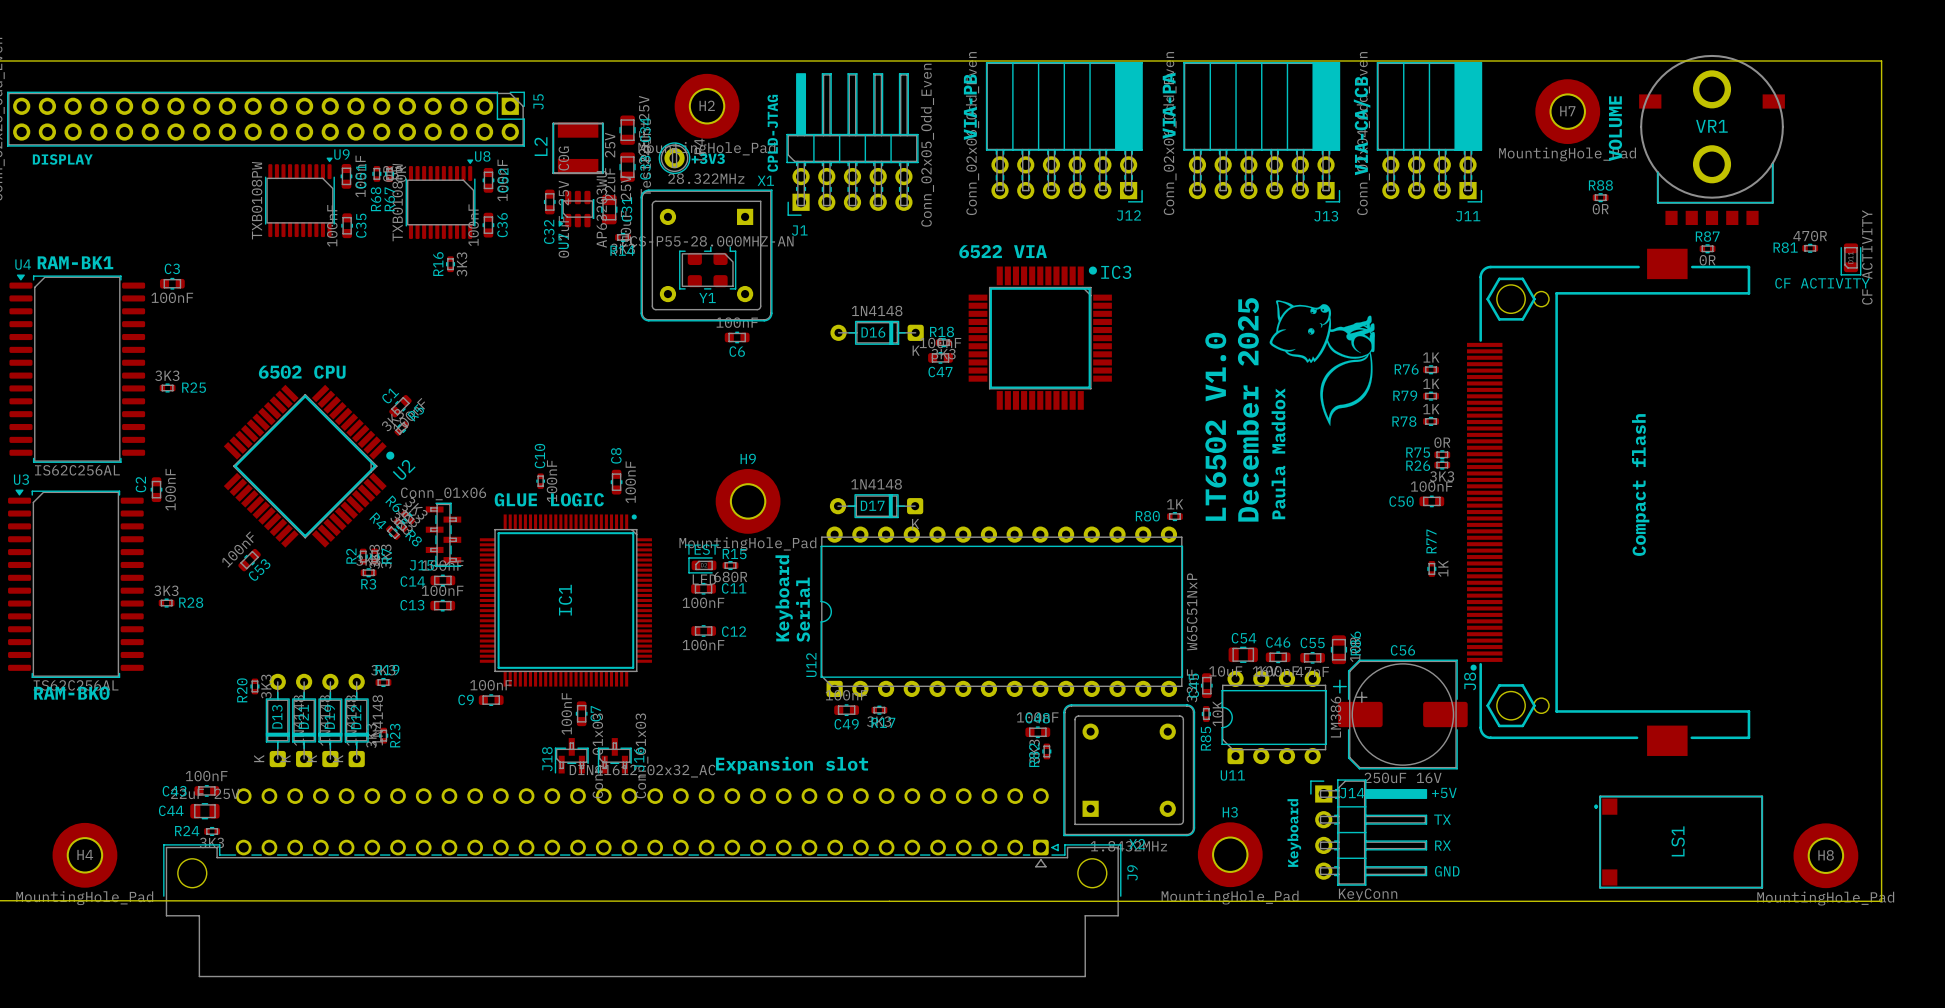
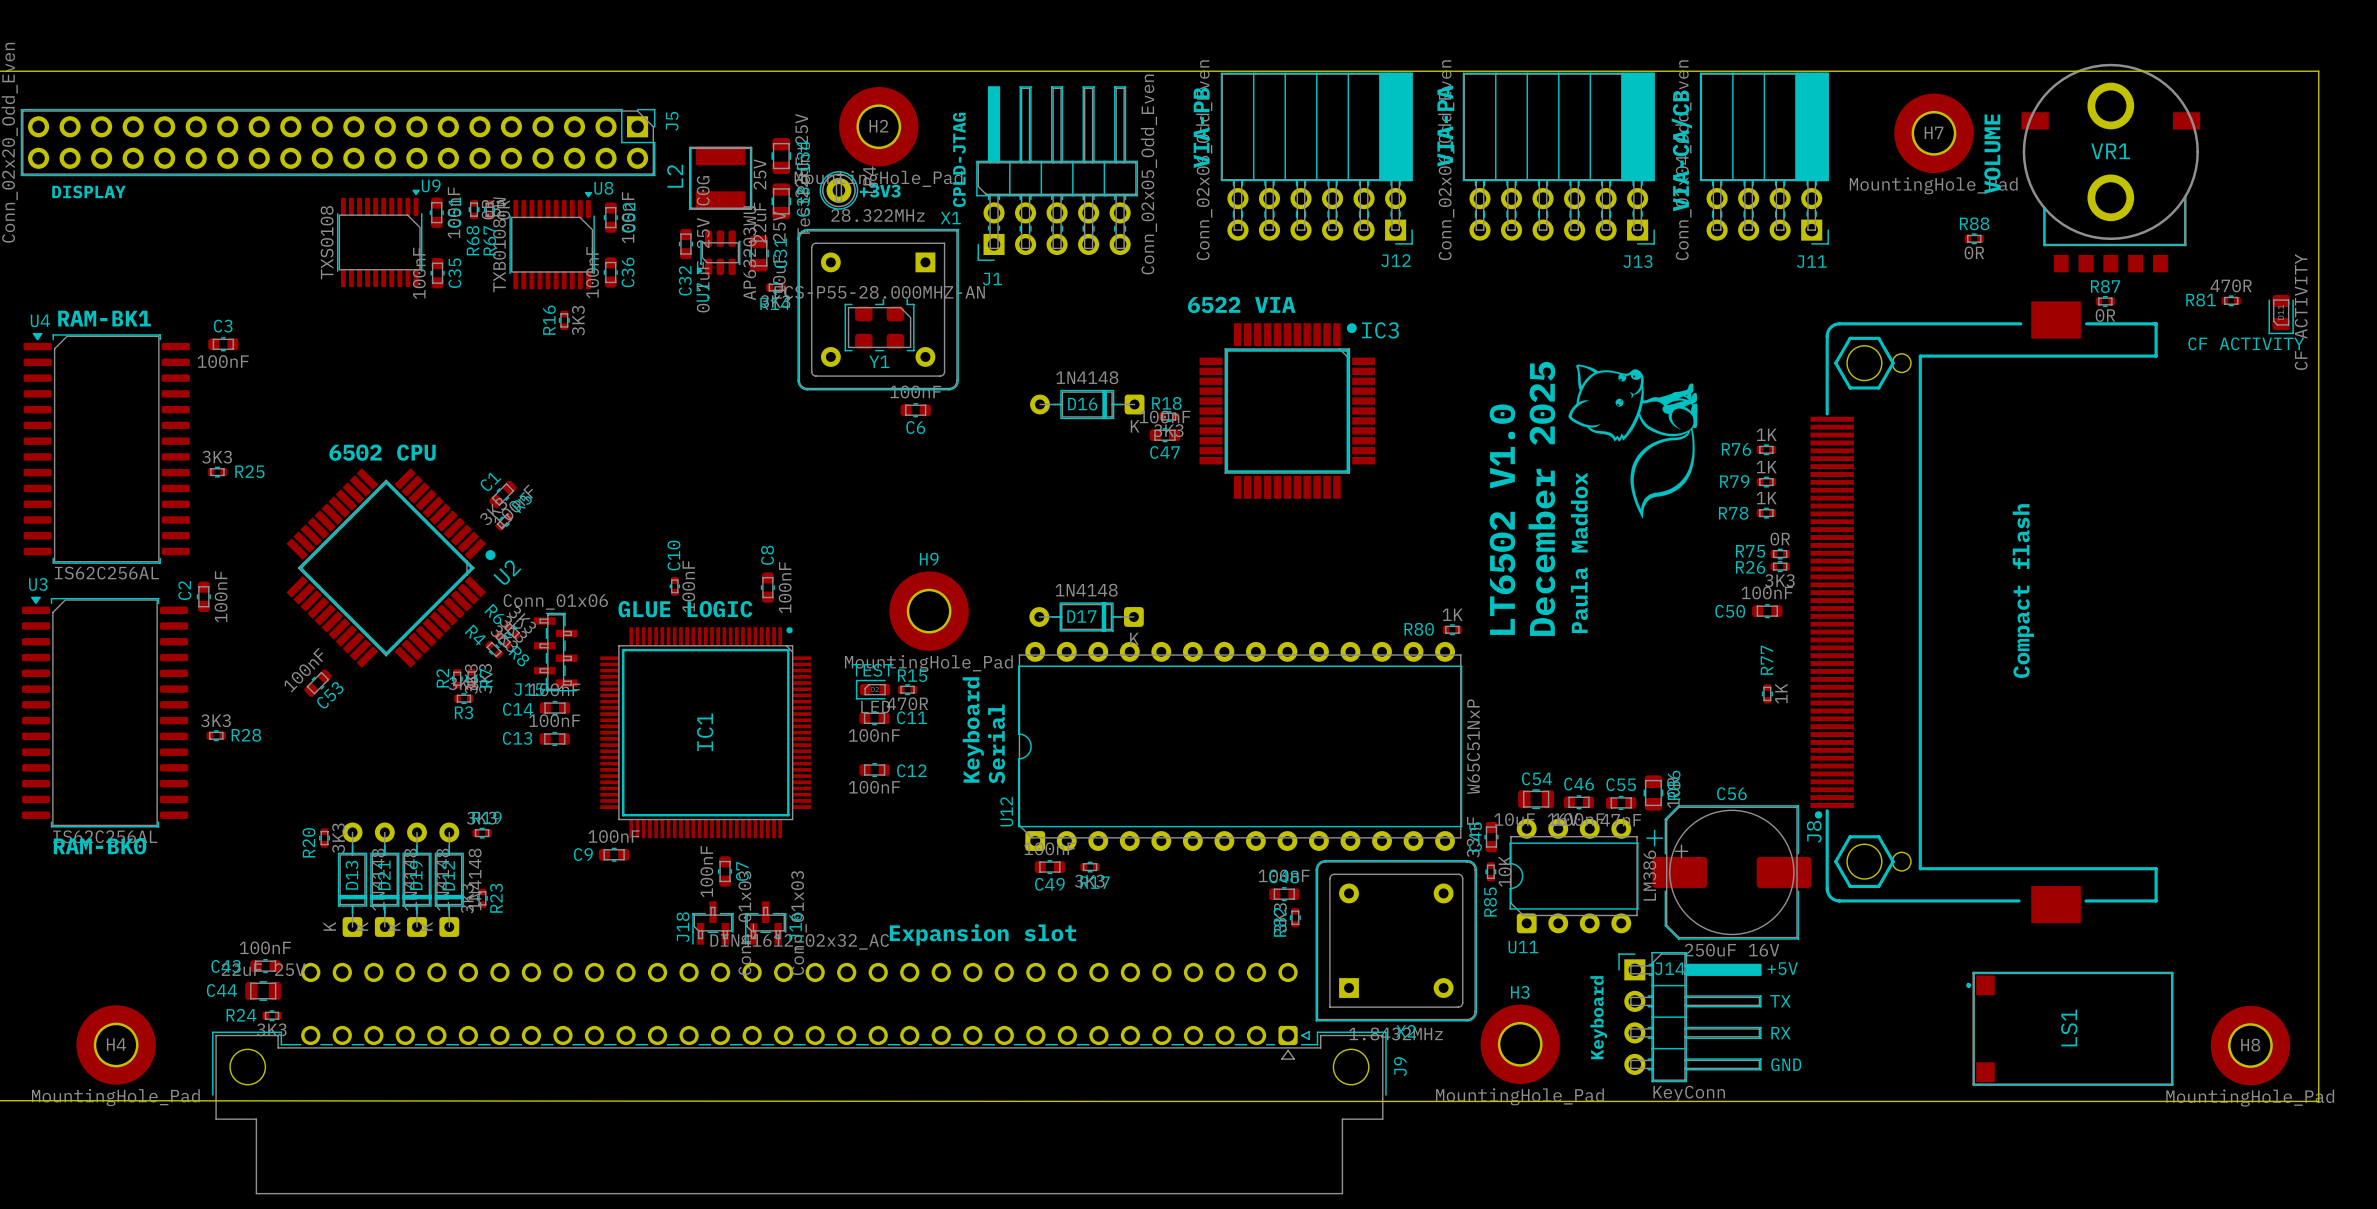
U9 value: TXB0108PW (257, 200) -> TXS0108 (327, 242)
R15 value: 680R (730, 576) -> 470R (907, 703)

